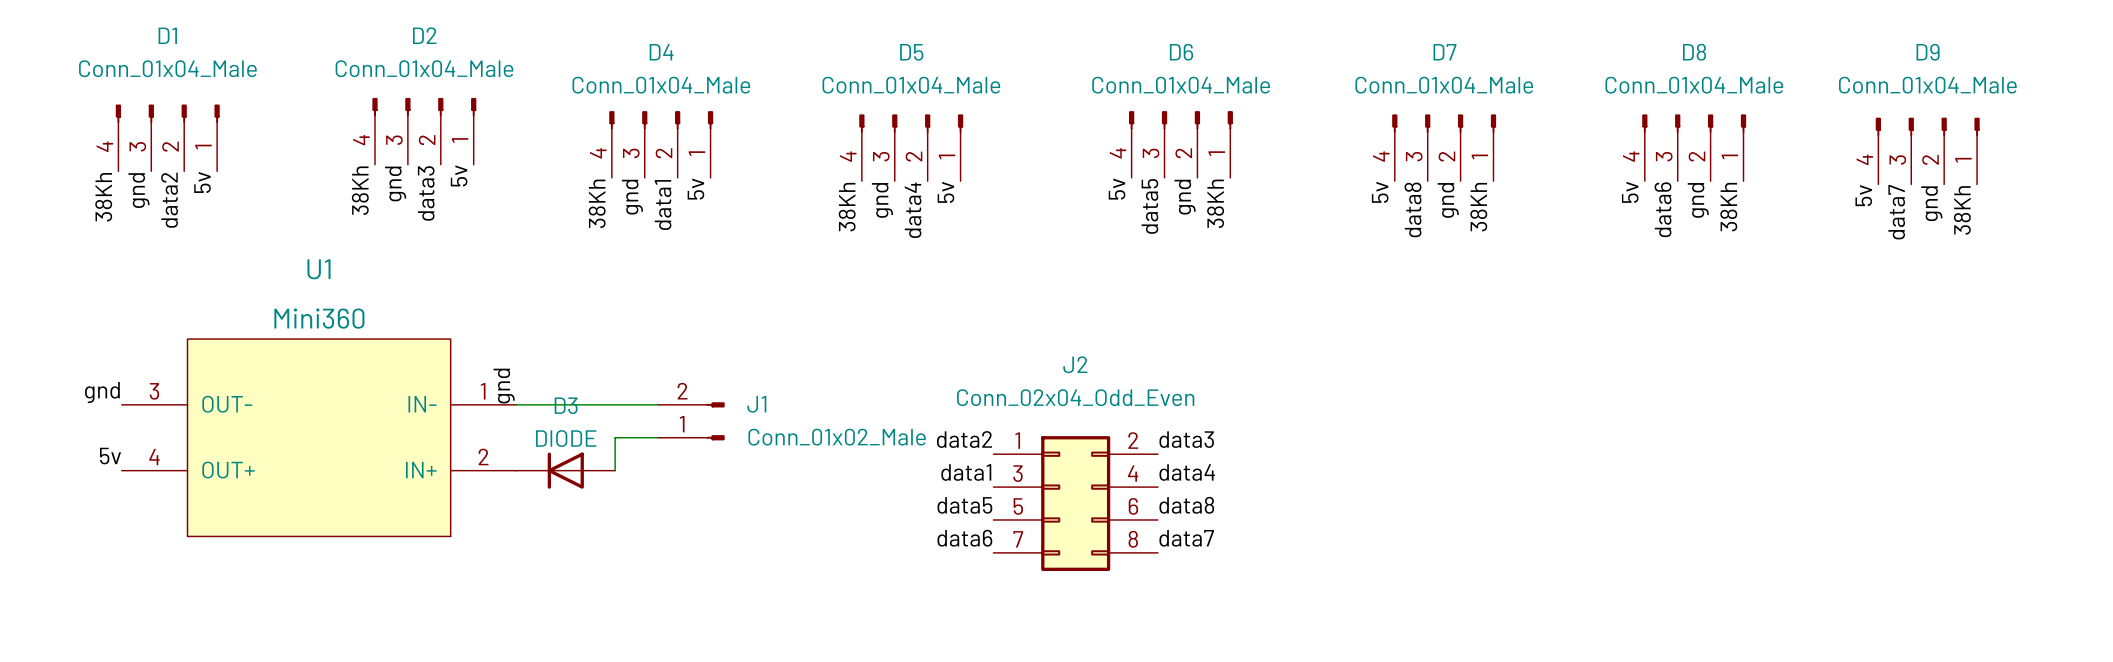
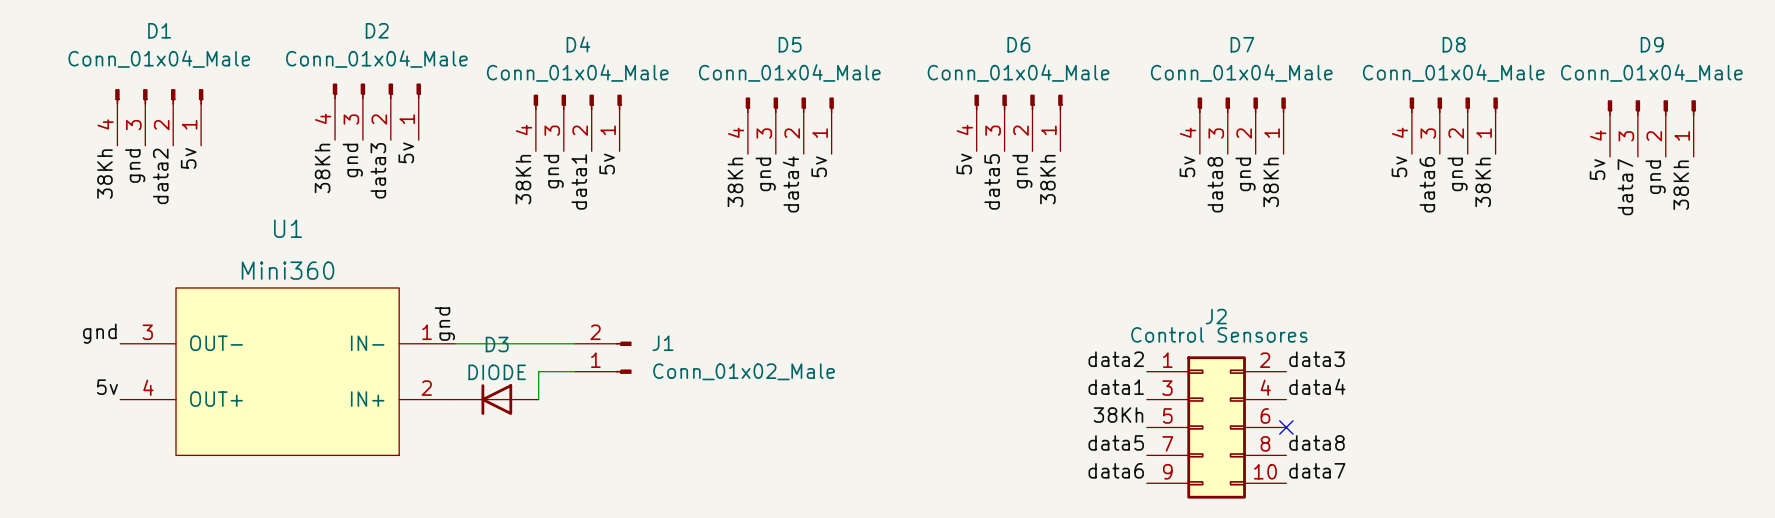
J2 value: Conn_02x04_Odd_Even (1075, 397) -> Control Sensores (1219, 334)
label: none -> data2 (1116, 359)
label: none -> data3 (1317, 359)
J2 symbol: [993, 436, 1158, 571] -> [1146, 356, 1287, 499]
label: data2 (964, 439) -> none
label: data3 (1186, 439) -> none
label: none -> data1 (1116, 387)
label: none -> data4 (1317, 386)
label: data1 (966, 472) -> none
label: data4 (1187, 472) -> none
label: none -> 38Kh (1118, 415)
no-connect mark: none -> (1286, 427)
label: data5 (964, 505) -> none
label: data8 (1186, 505) -> none
label: none -> data5 (1116, 442)
label: none -> data8 (1317, 442)
label: data6 (964, 538) -> none
label: data7 (1186, 538) -> none
label: none -> data6 (1116, 470)
label: none -> data7 (1317, 470)

